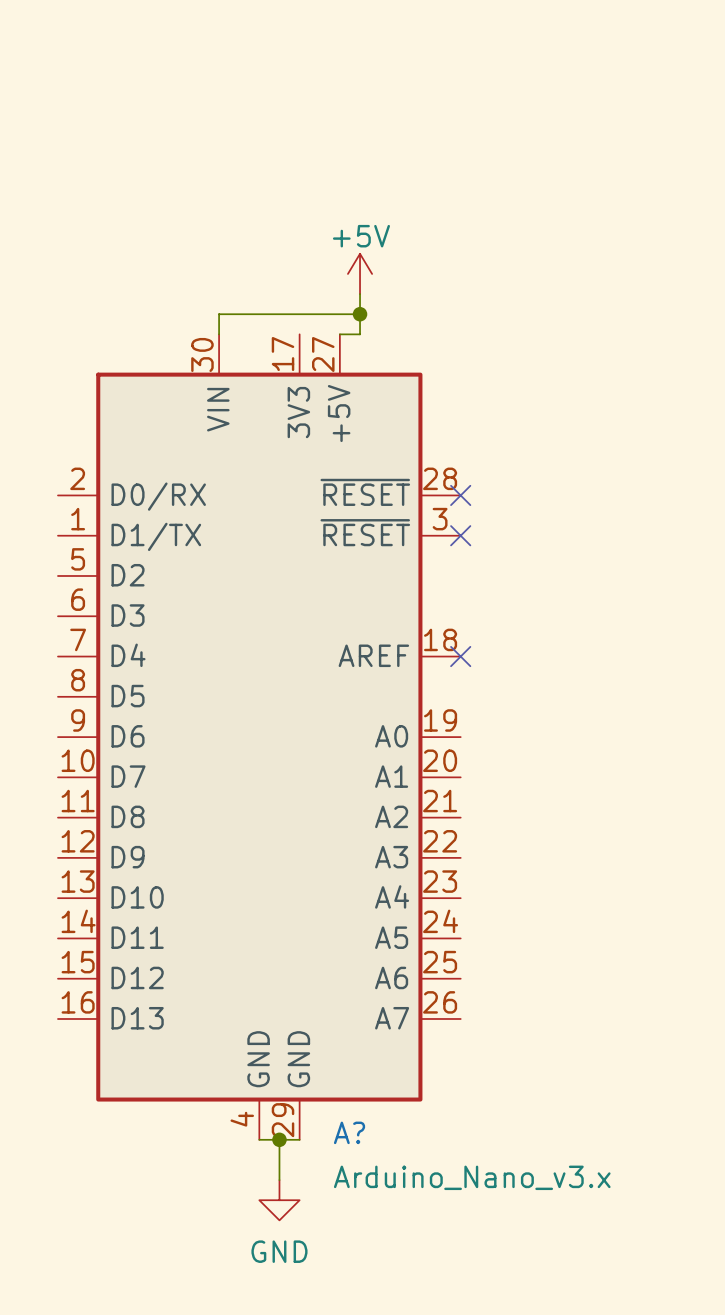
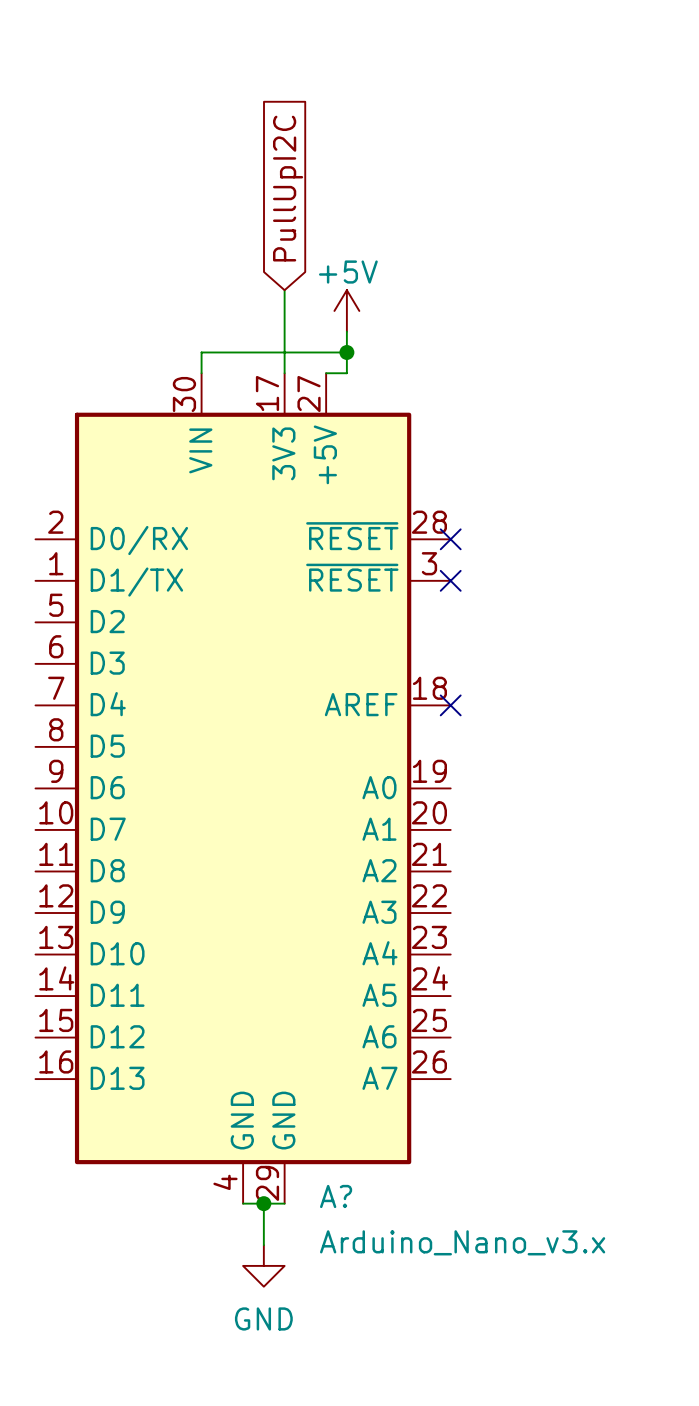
global label: none -> PullUpI2C (288, 188)
wire: none -> (284, 290) (284, 373)

